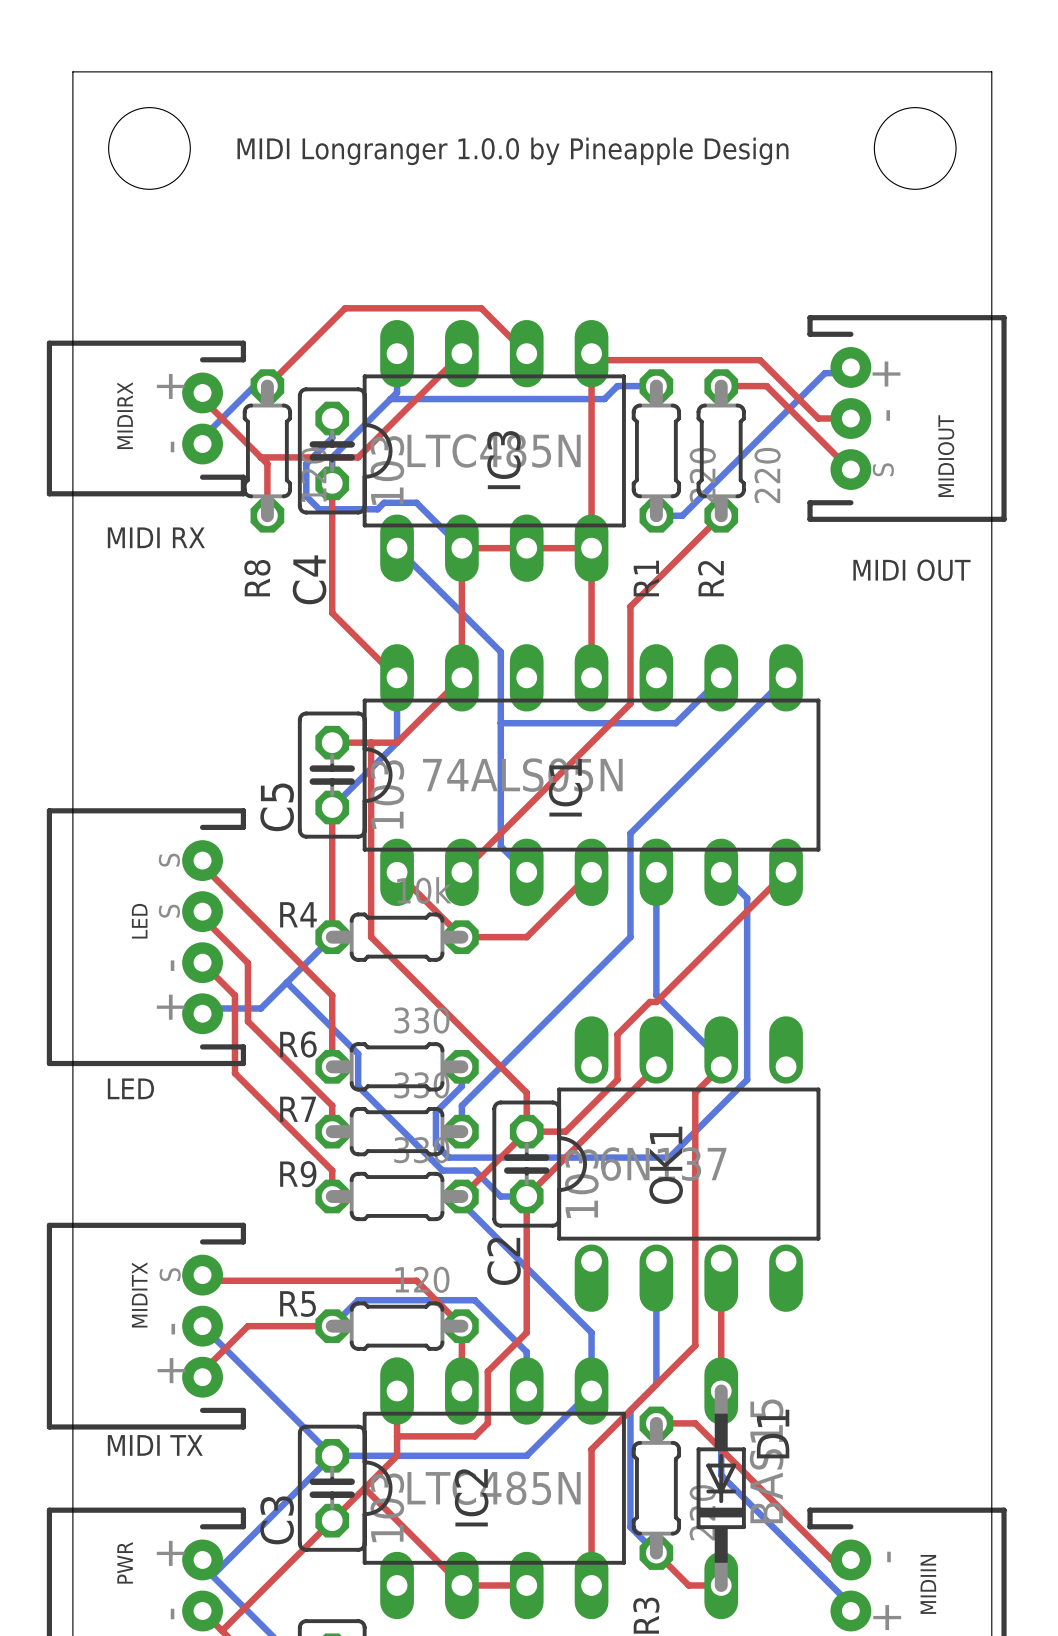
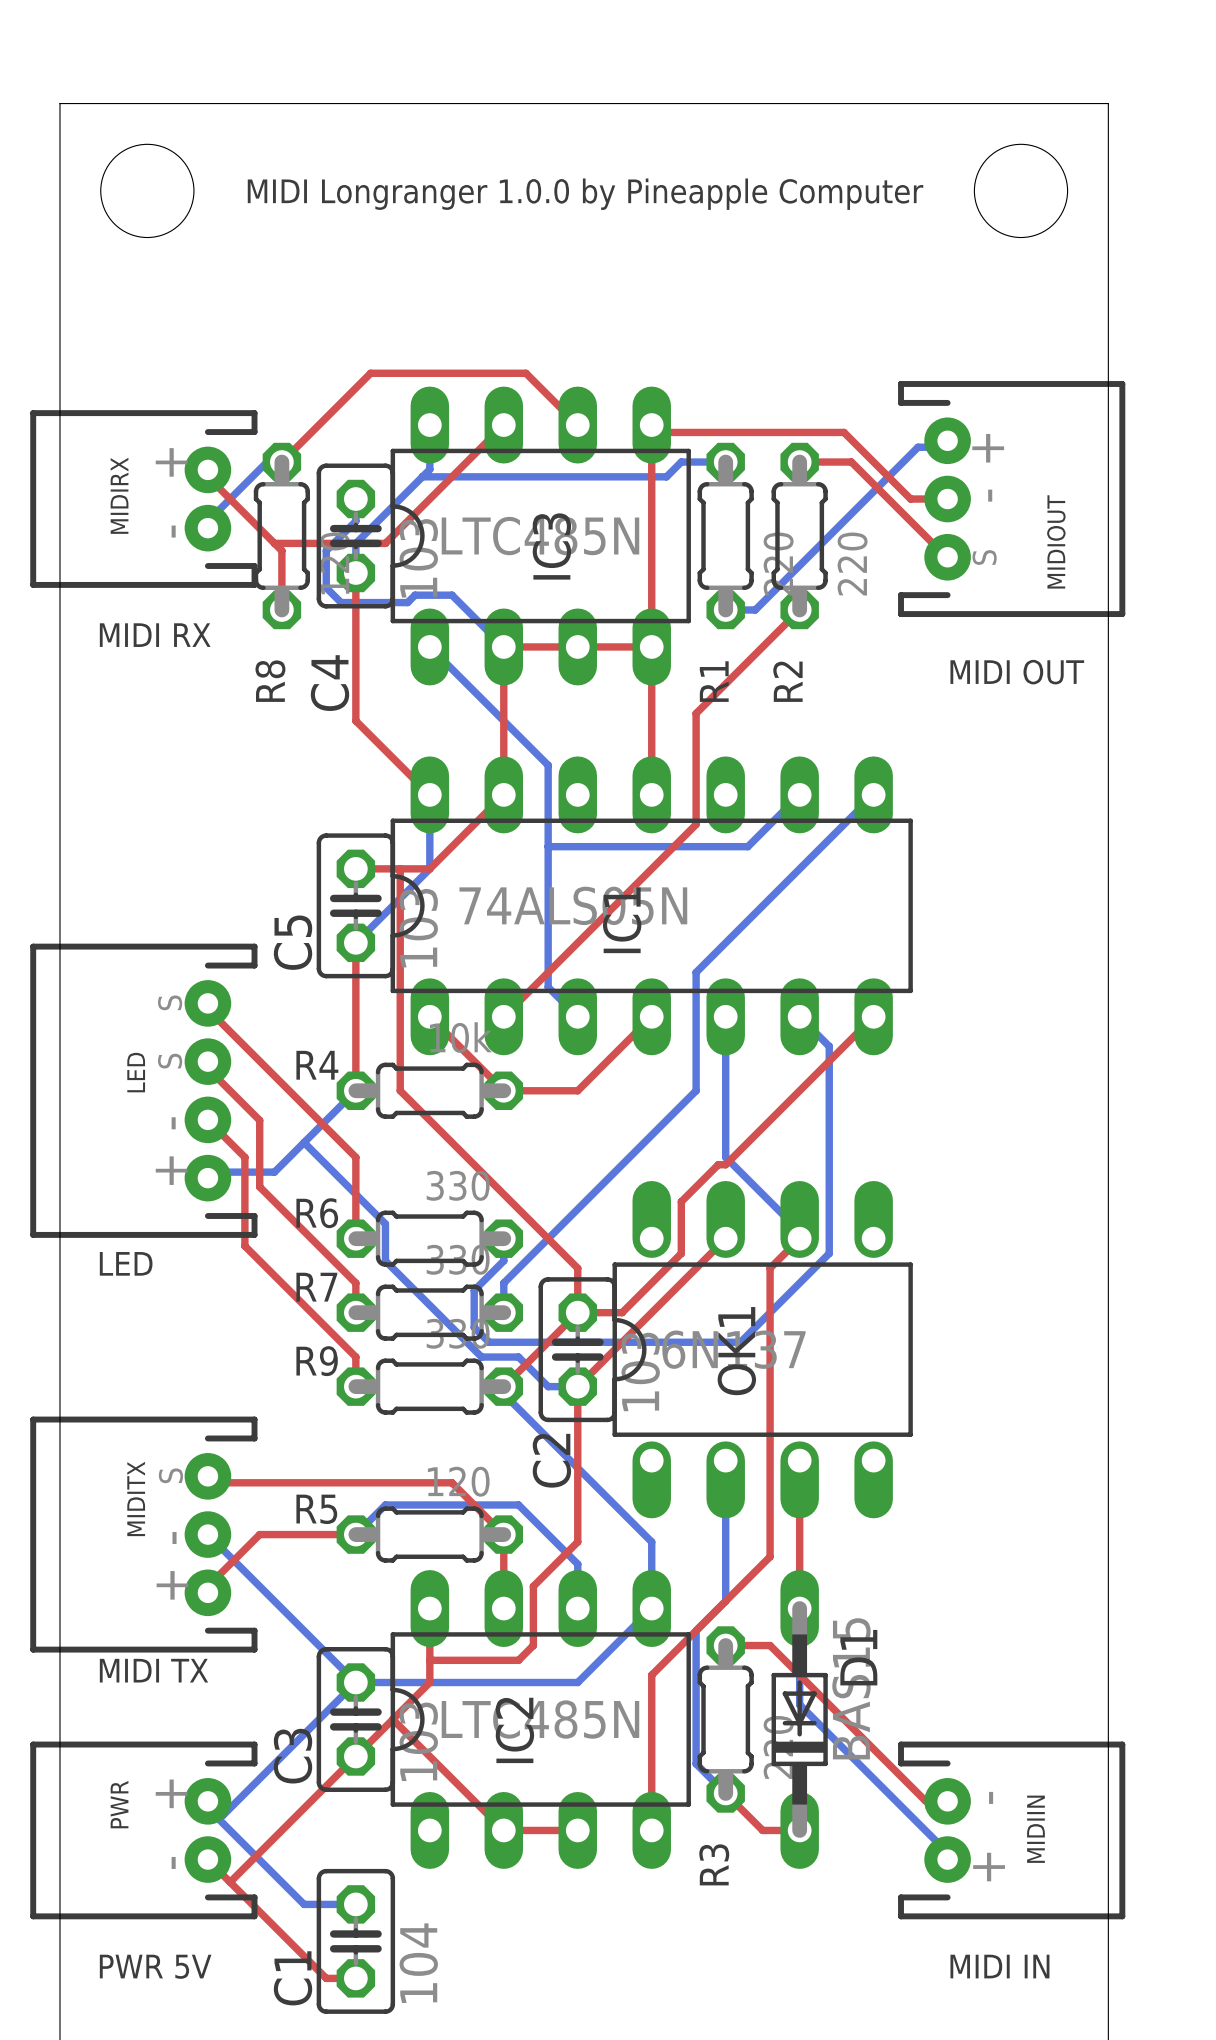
text: MIDI Longranger 1.0.0 by Pineapple Design (512, 151) -> MIDI Longranger 1.0.0 by Pineapple Computer (585, 194)

